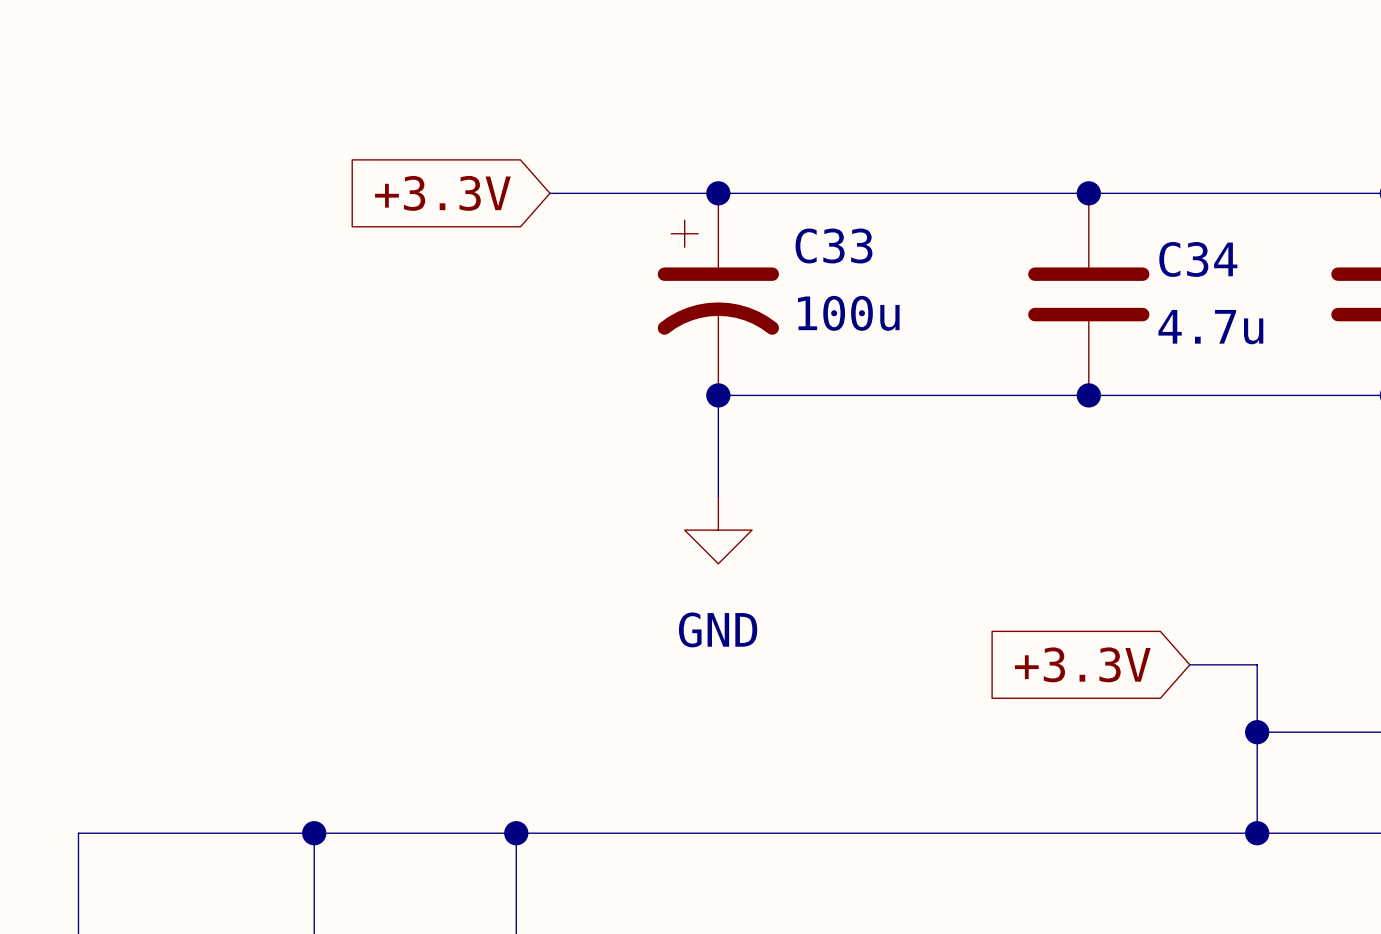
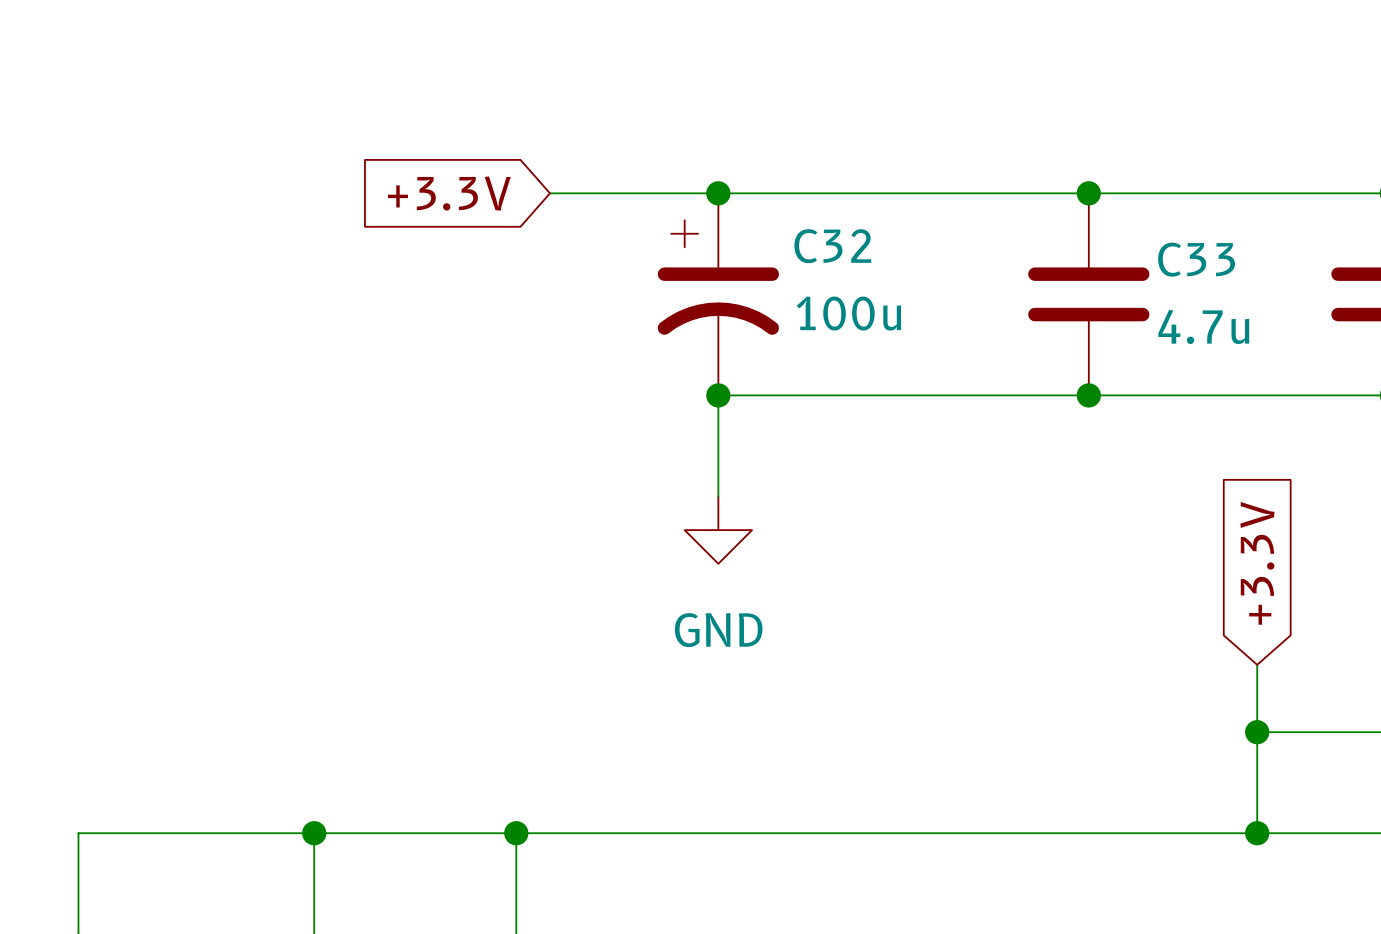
C33 name: C33 (833, 245) -> C32 (832, 246)
C34 name: C34 (1198, 259) -> C33 (1196, 259)
global label rotation: 0° (1082, 664) -> 90° clockwise (1257, 563)
wire: (1189, 664) (1257, 664) -> none

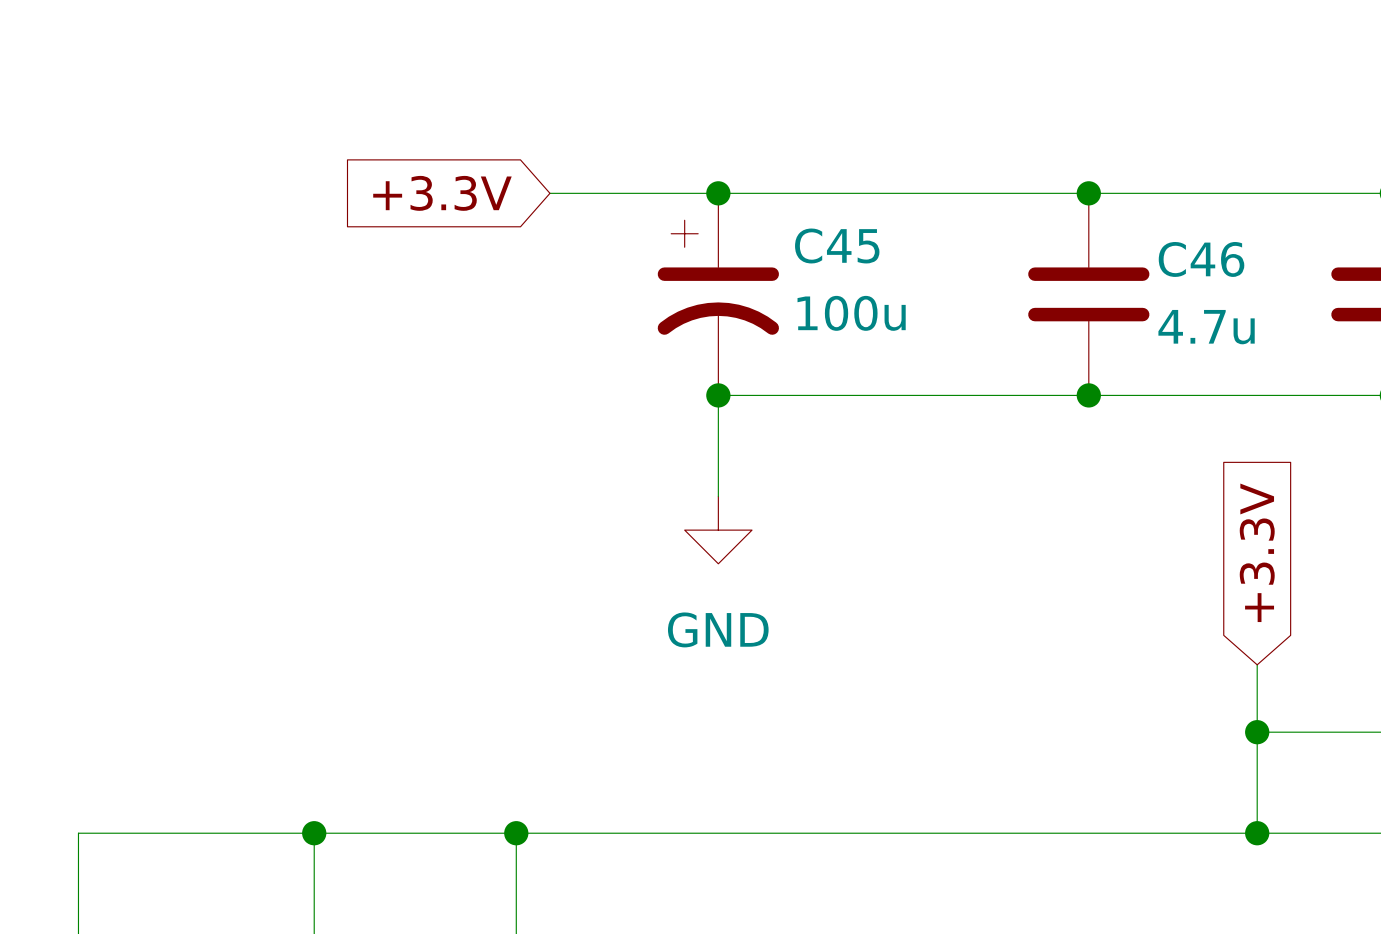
C32 name: C32 (832, 246) -> C45 (837, 245)
C33 name: C33 (1196, 259) -> C46 (1201, 259)

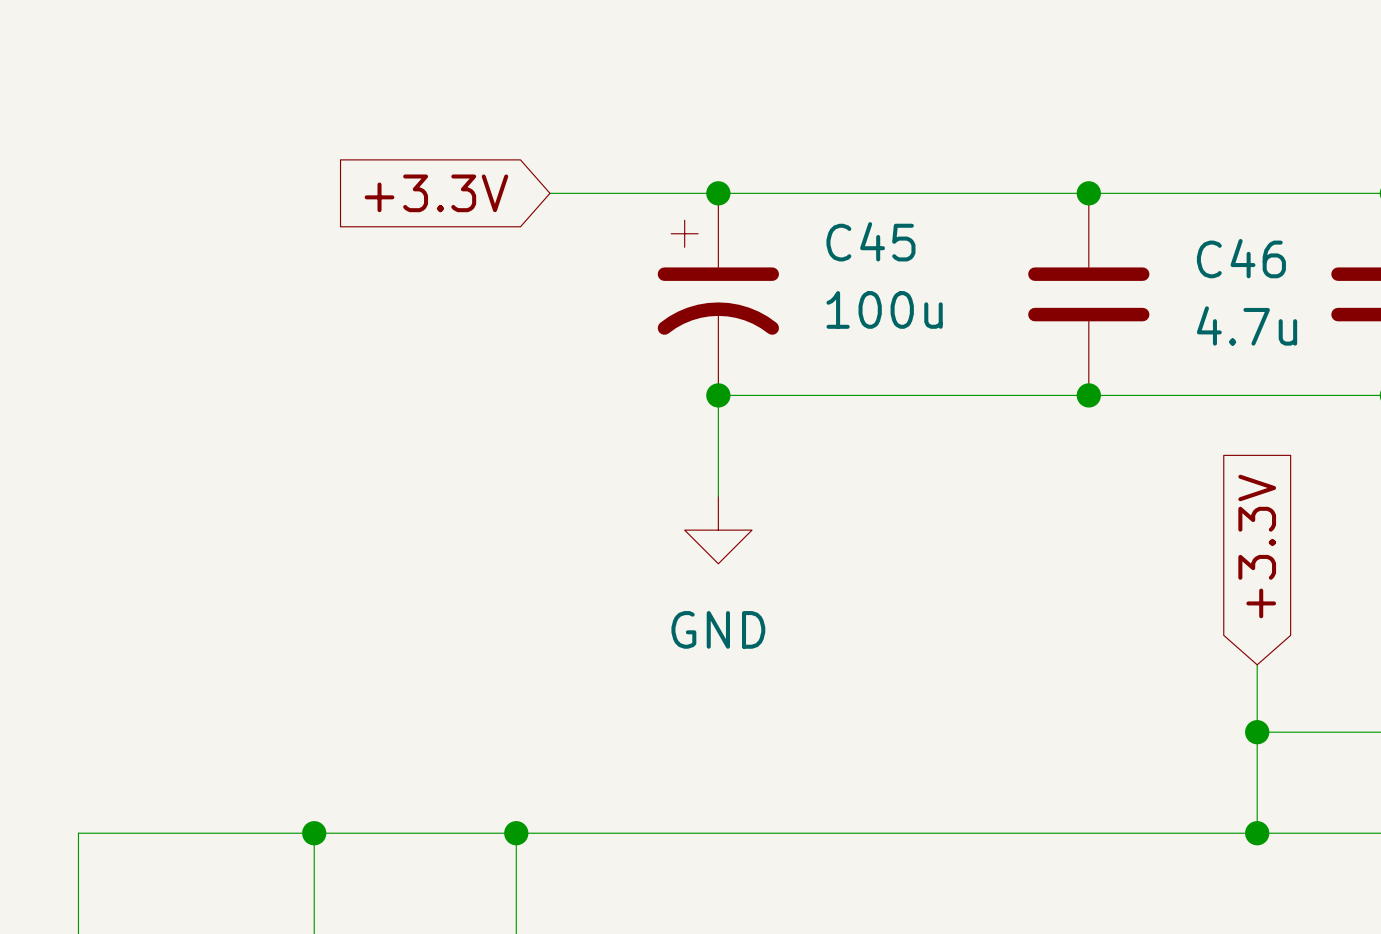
C45 name position: C45 (837, 245) -> C45 (870, 241)
C46 name position: C46 (1201, 259) -> C46 (1241, 258)
C45 value position: 100u (851, 313) -> 100u (884, 309)
C46 value position: 4.7u (1206, 327) -> 4.7u (1247, 325)

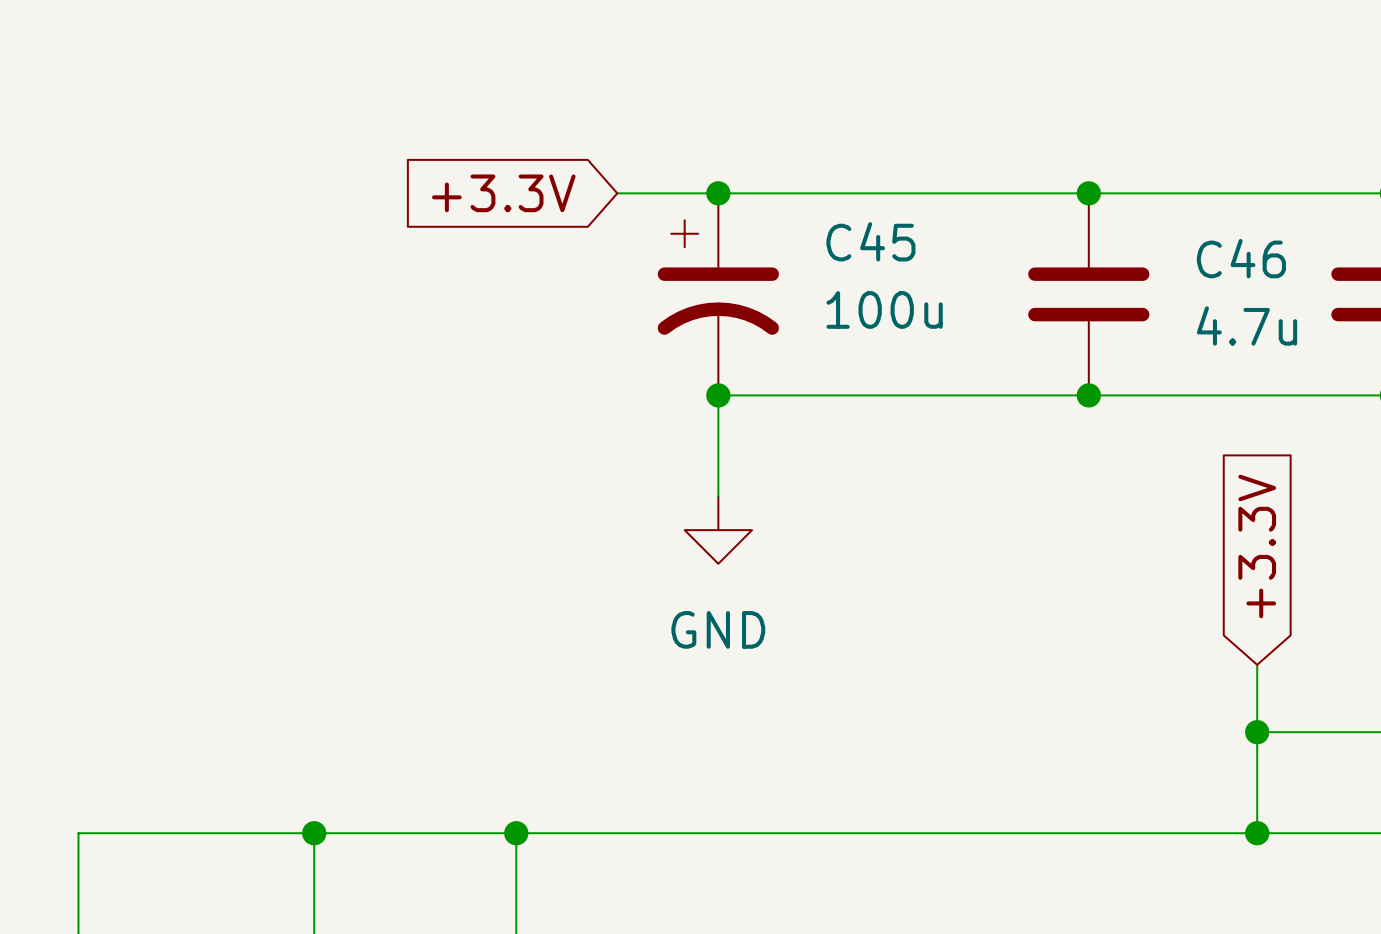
global label position: +3.3V (436, 193) -> +3.3V (503, 193)
wire: (549, 193) (617, 193) -> none

